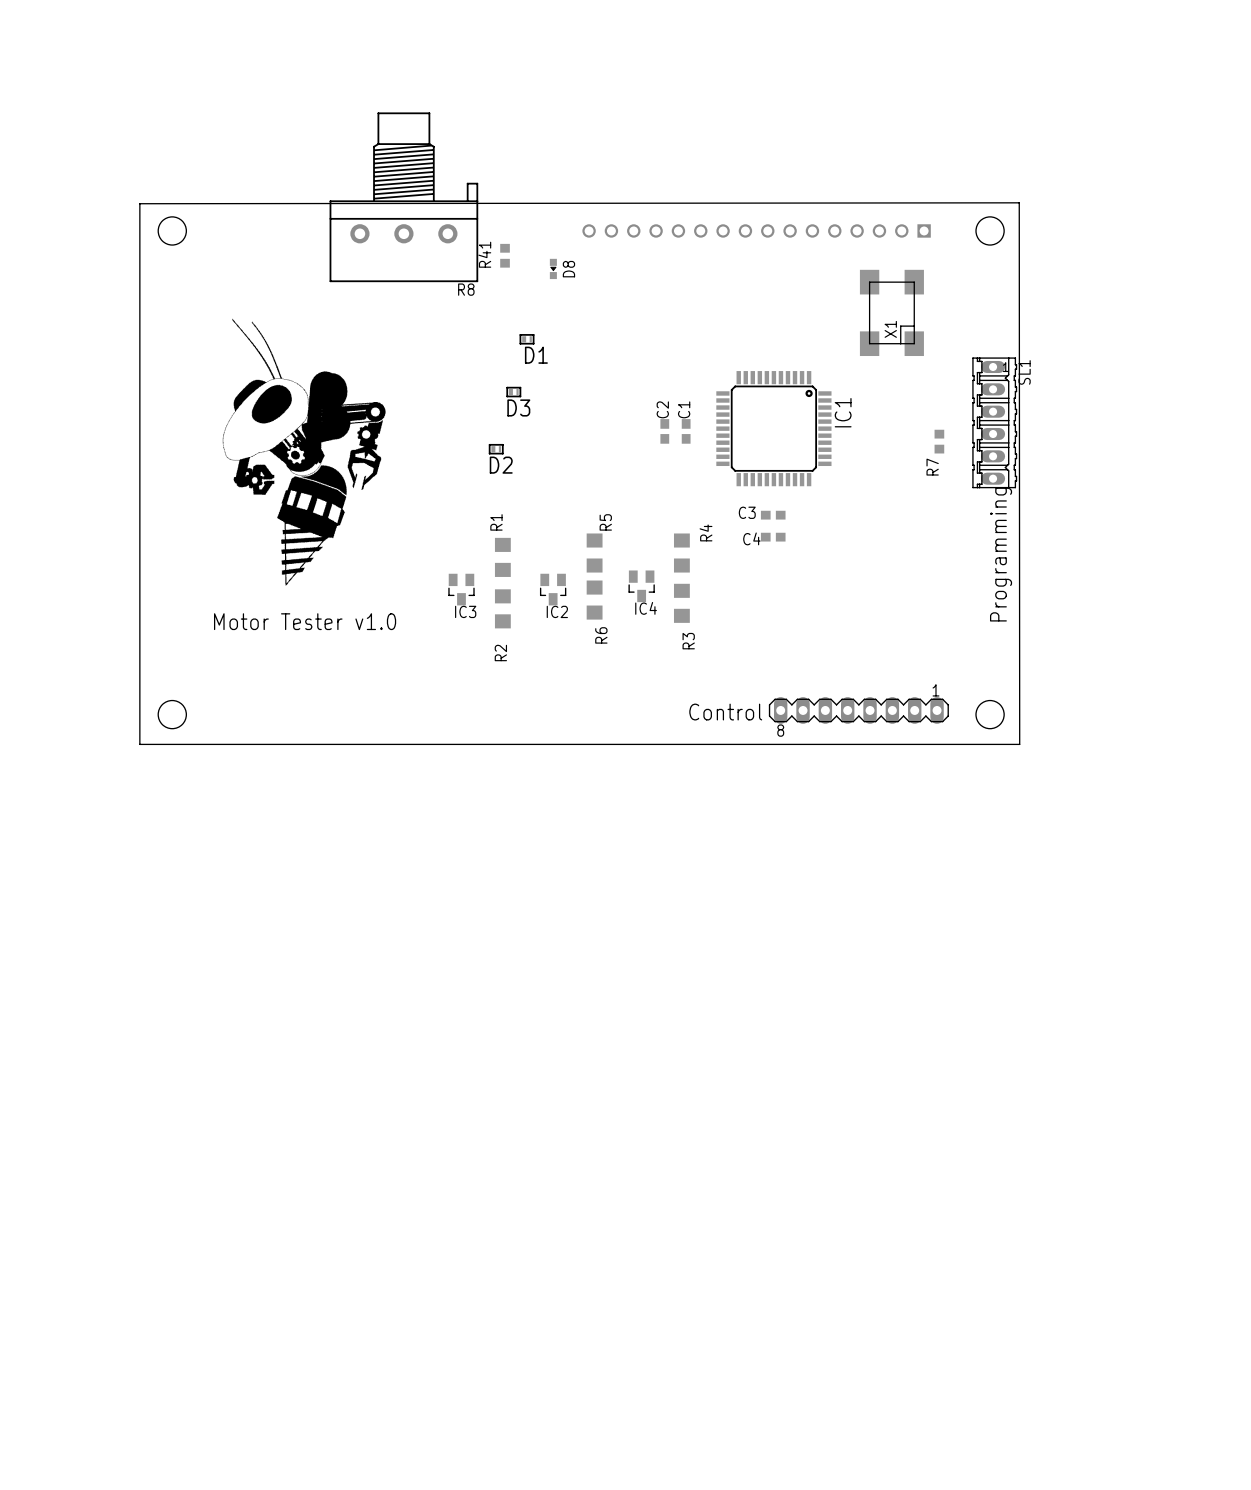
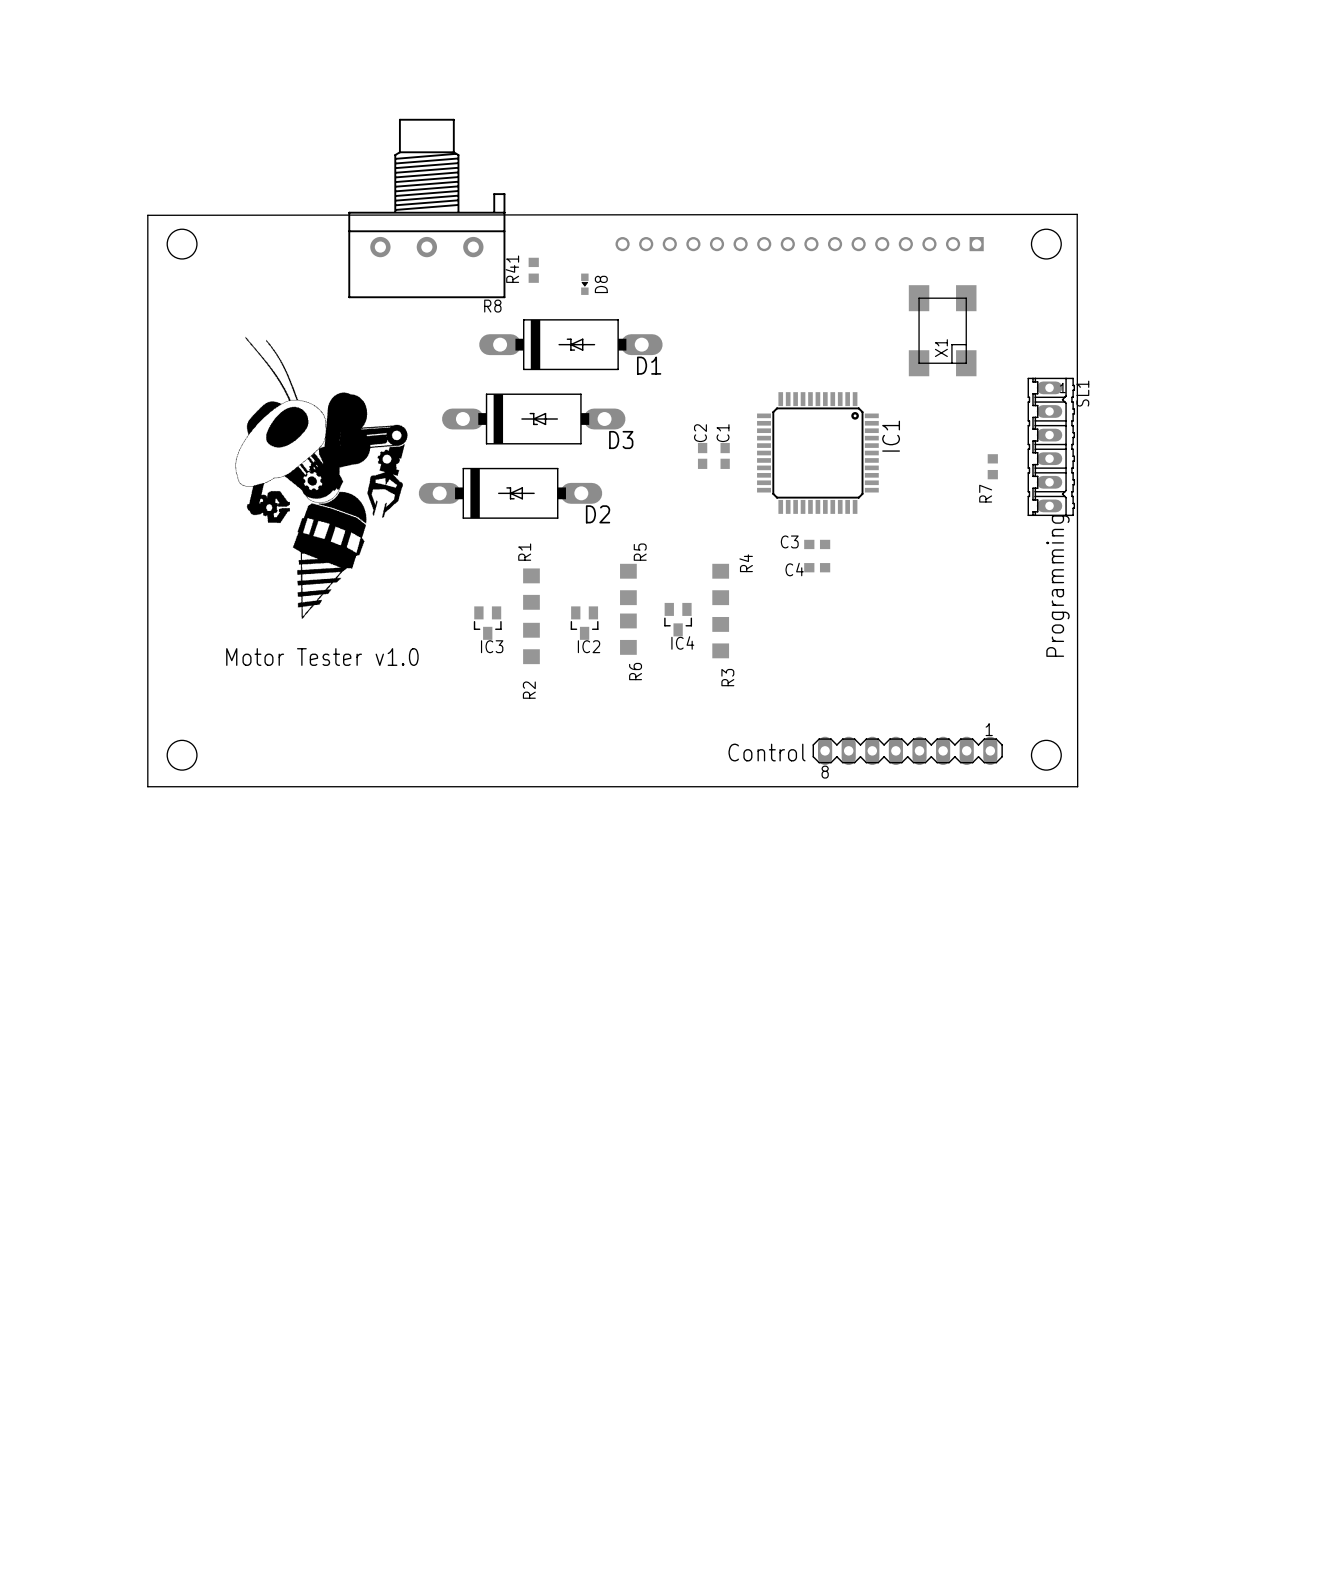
D1 footprint: [519, 334, 535, 345] -> [479, 319, 663, 371]
D1 name position: D1 (536, 355) -> D1 (649, 365)
D3 footprint: [506, 386, 522, 398] -> [442, 393, 626, 445]
D3 name position: D3 (518, 407) -> D3 (621, 440)
D2 footprint: [488, 443, 504, 455] -> [418, 467, 603, 519]
D2 name position: D2 (501, 465) -> D2 (598, 514)

